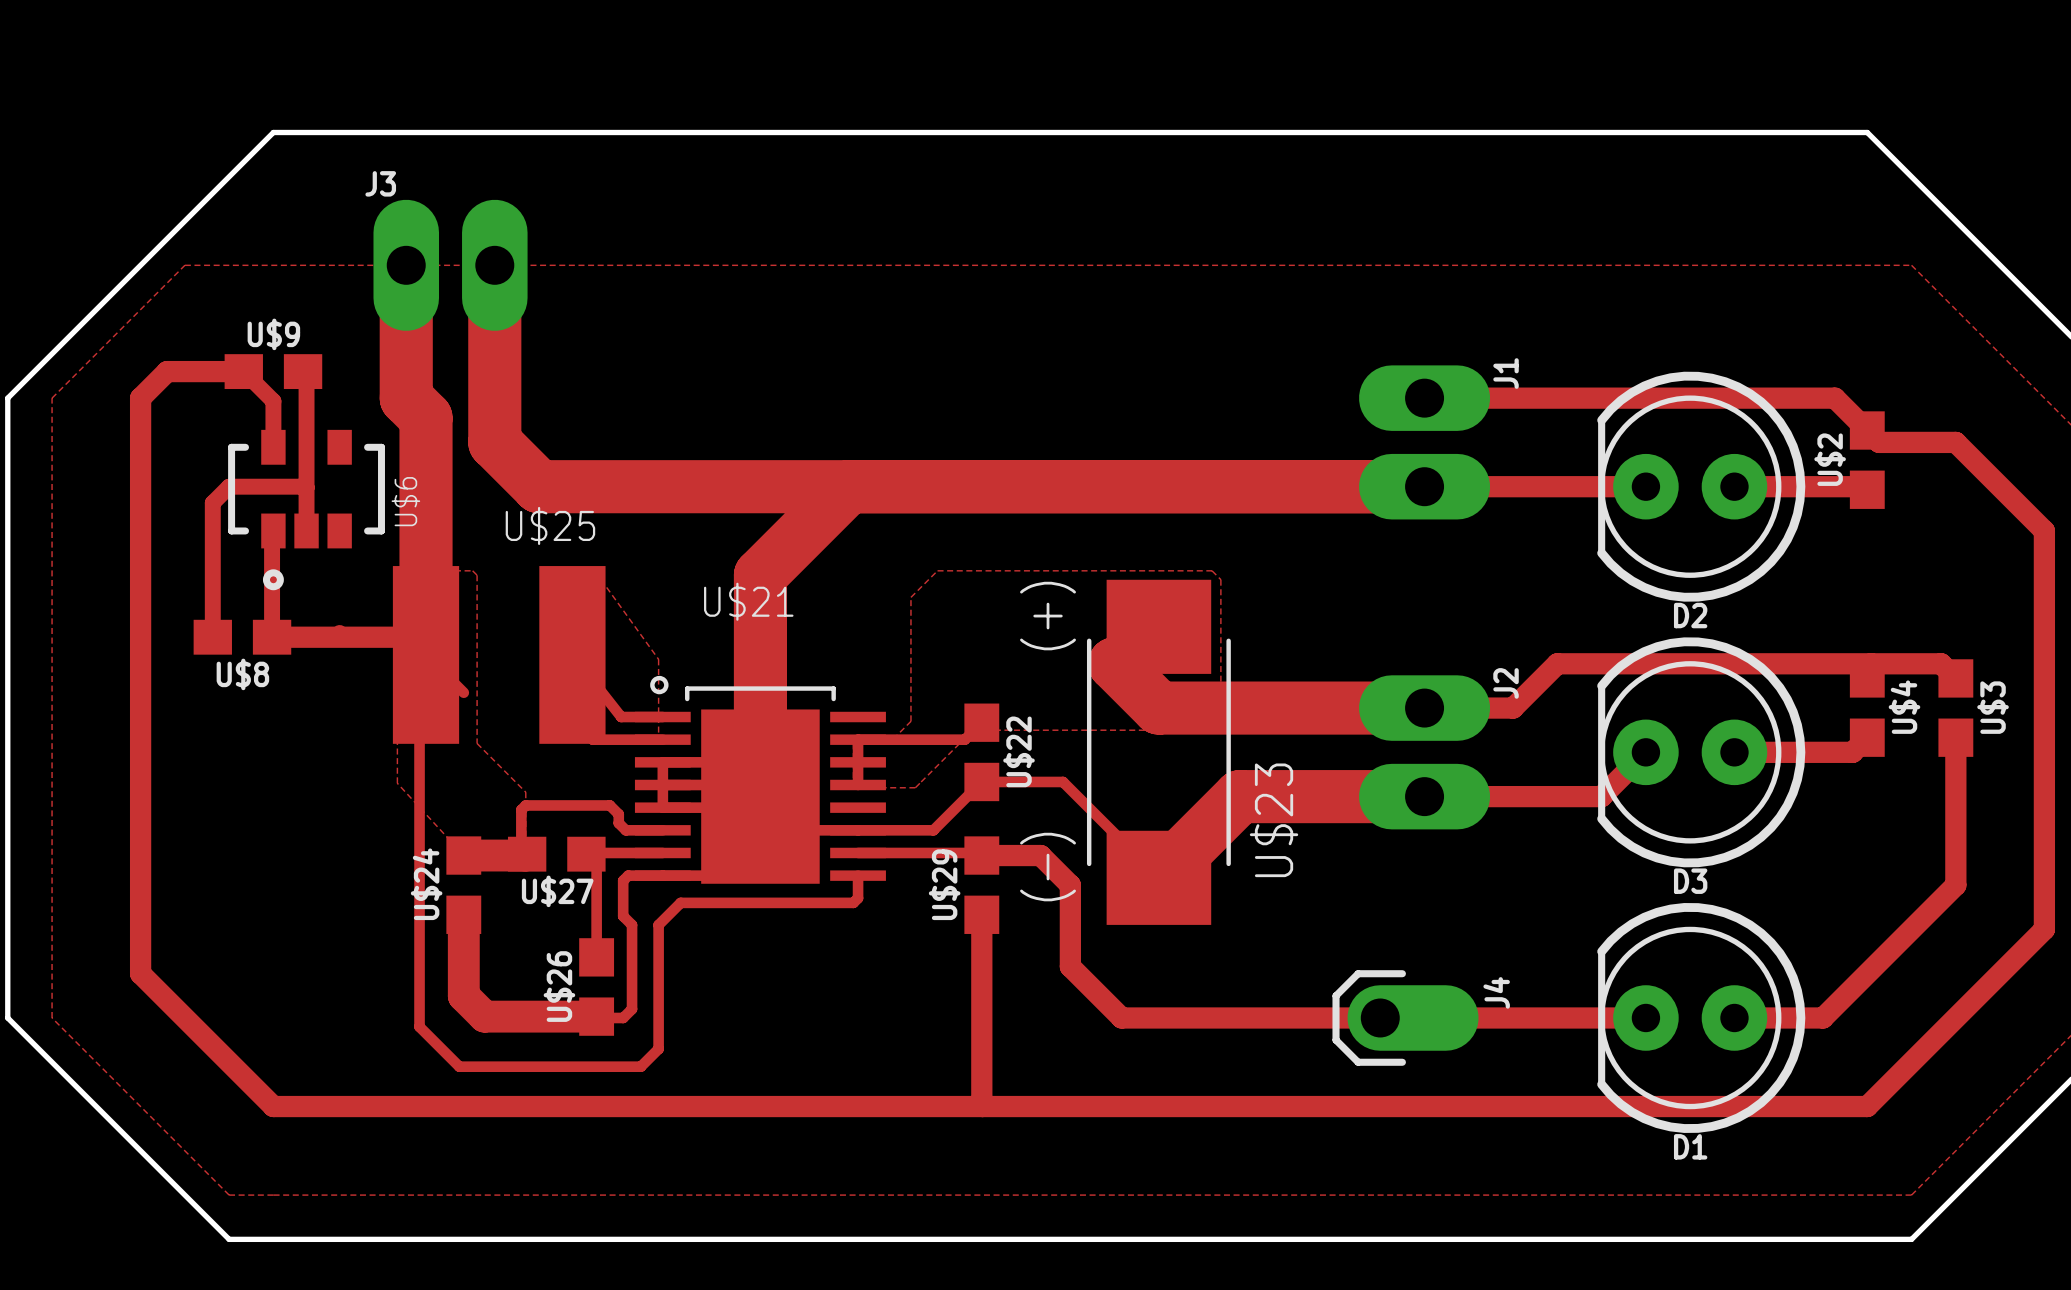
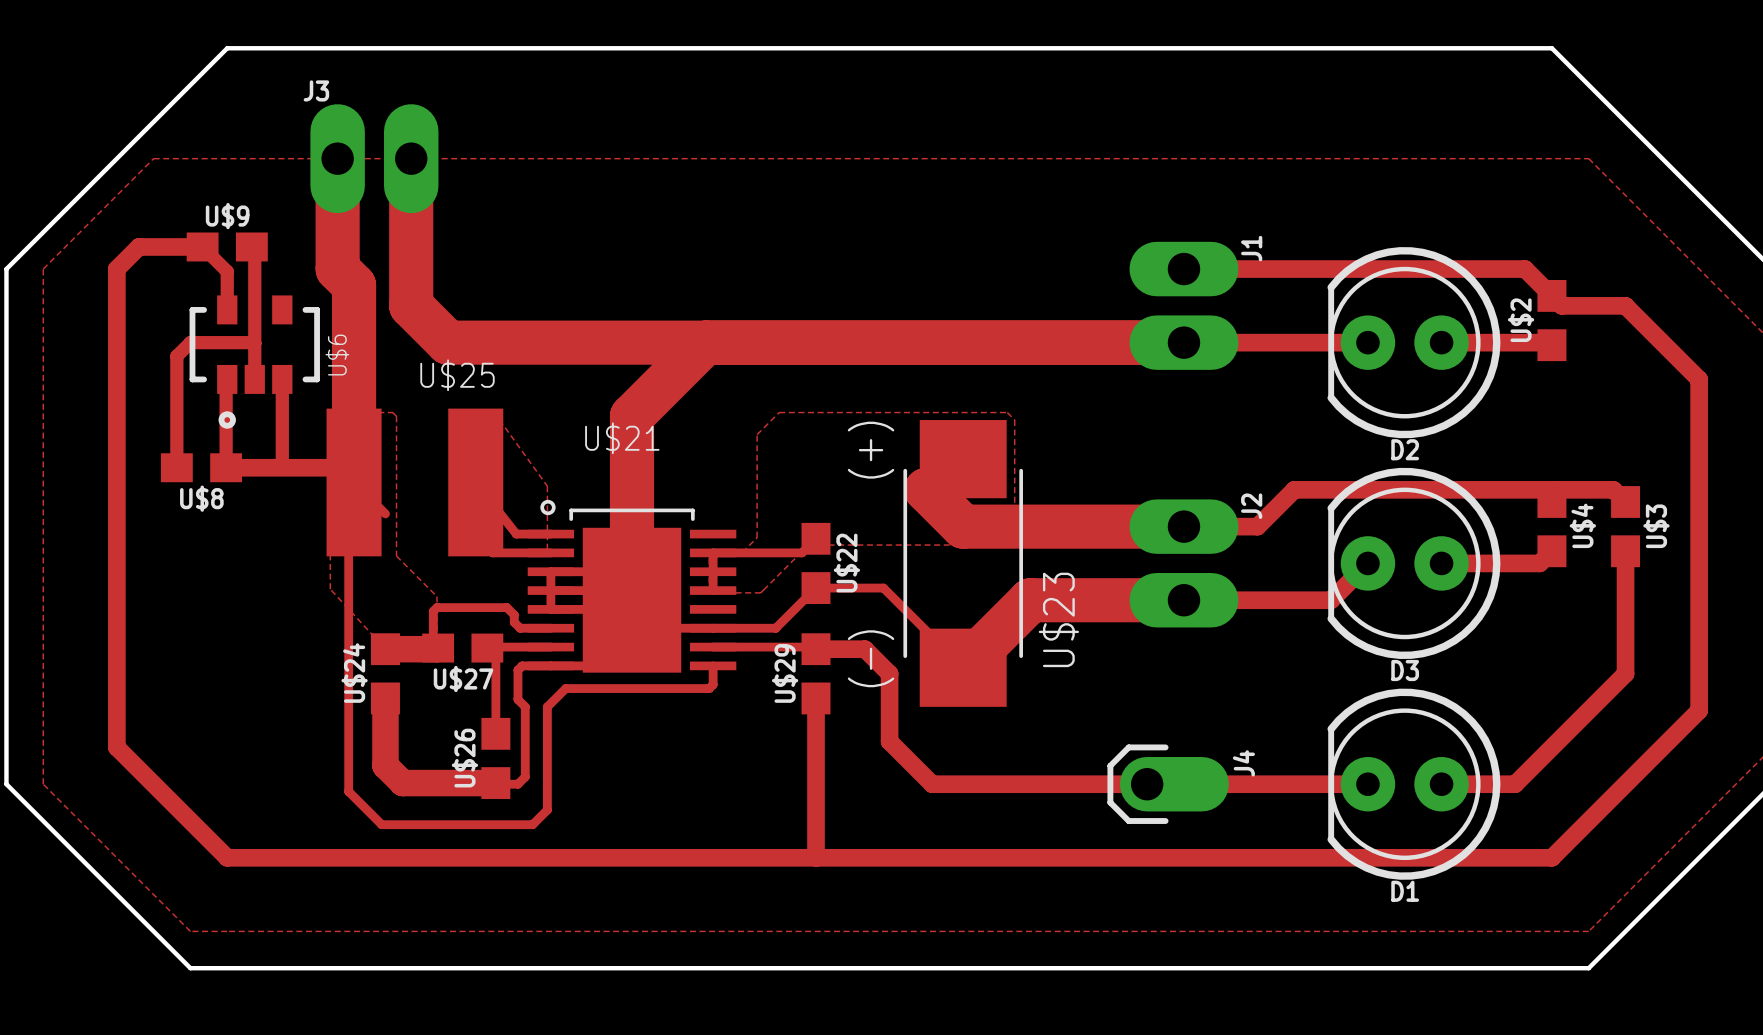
track: none -> (282, 379) (282, 464)

